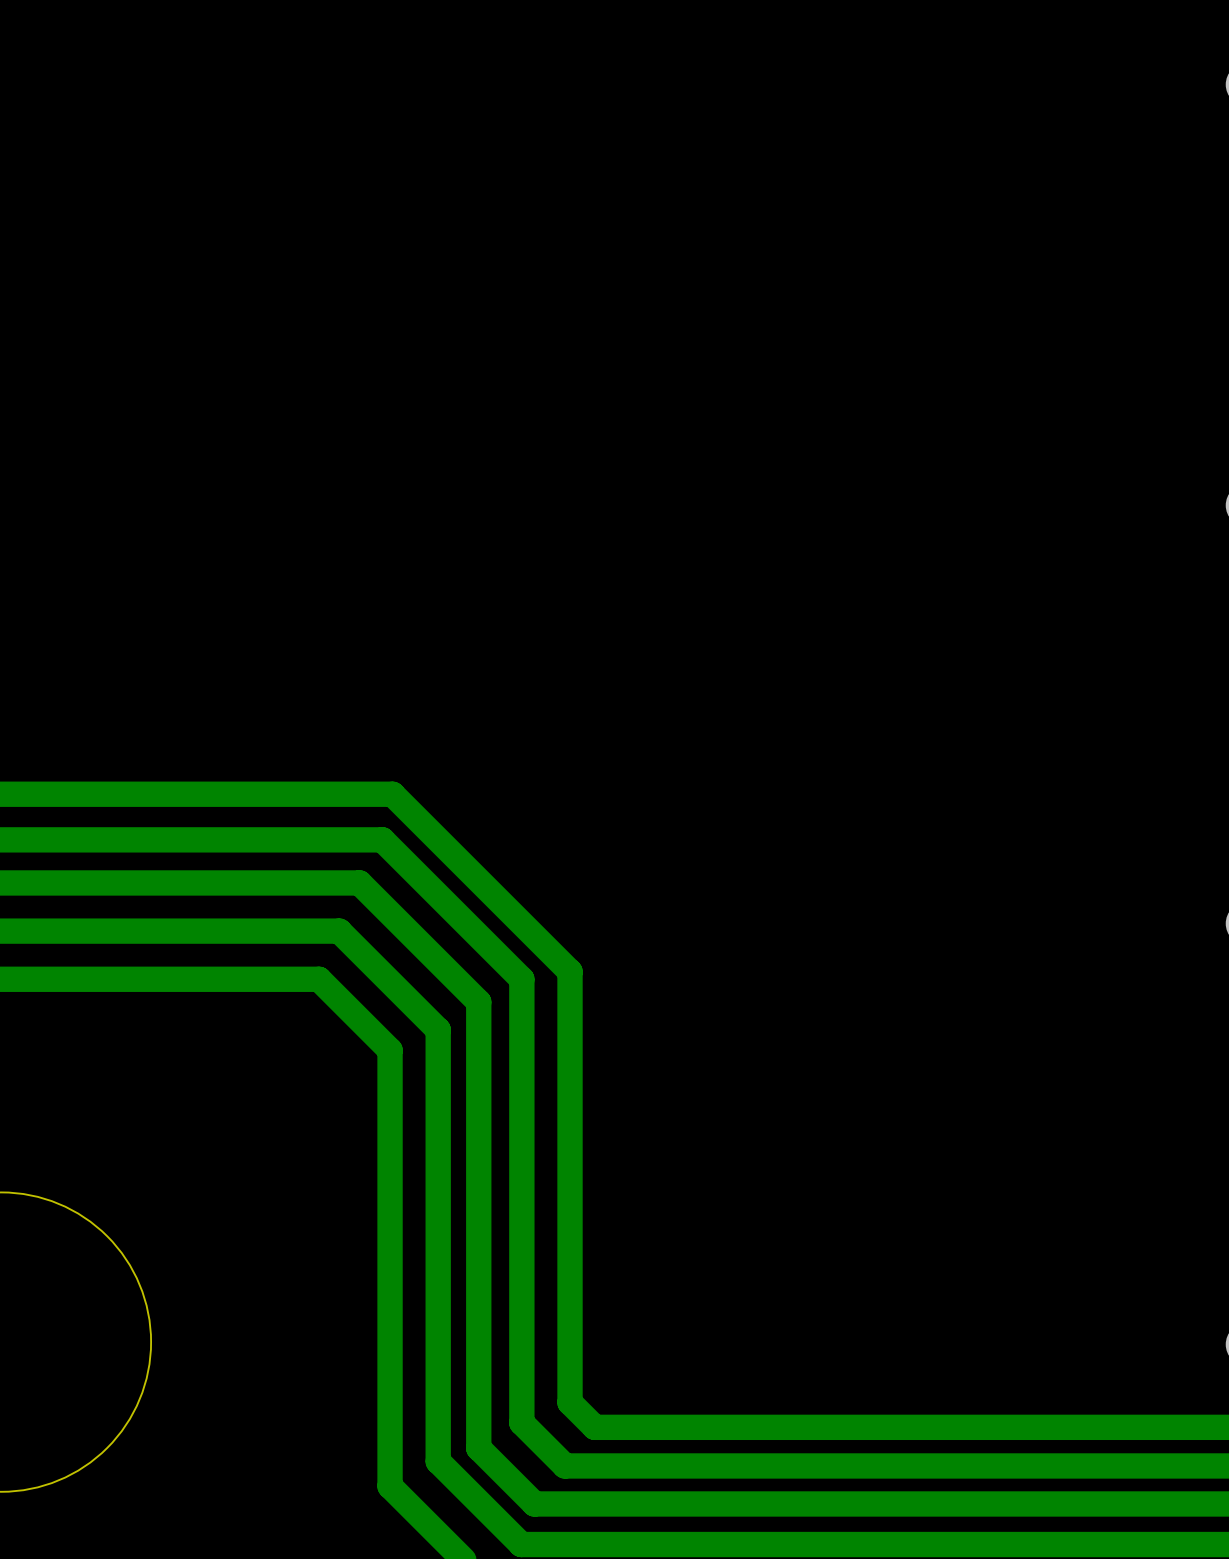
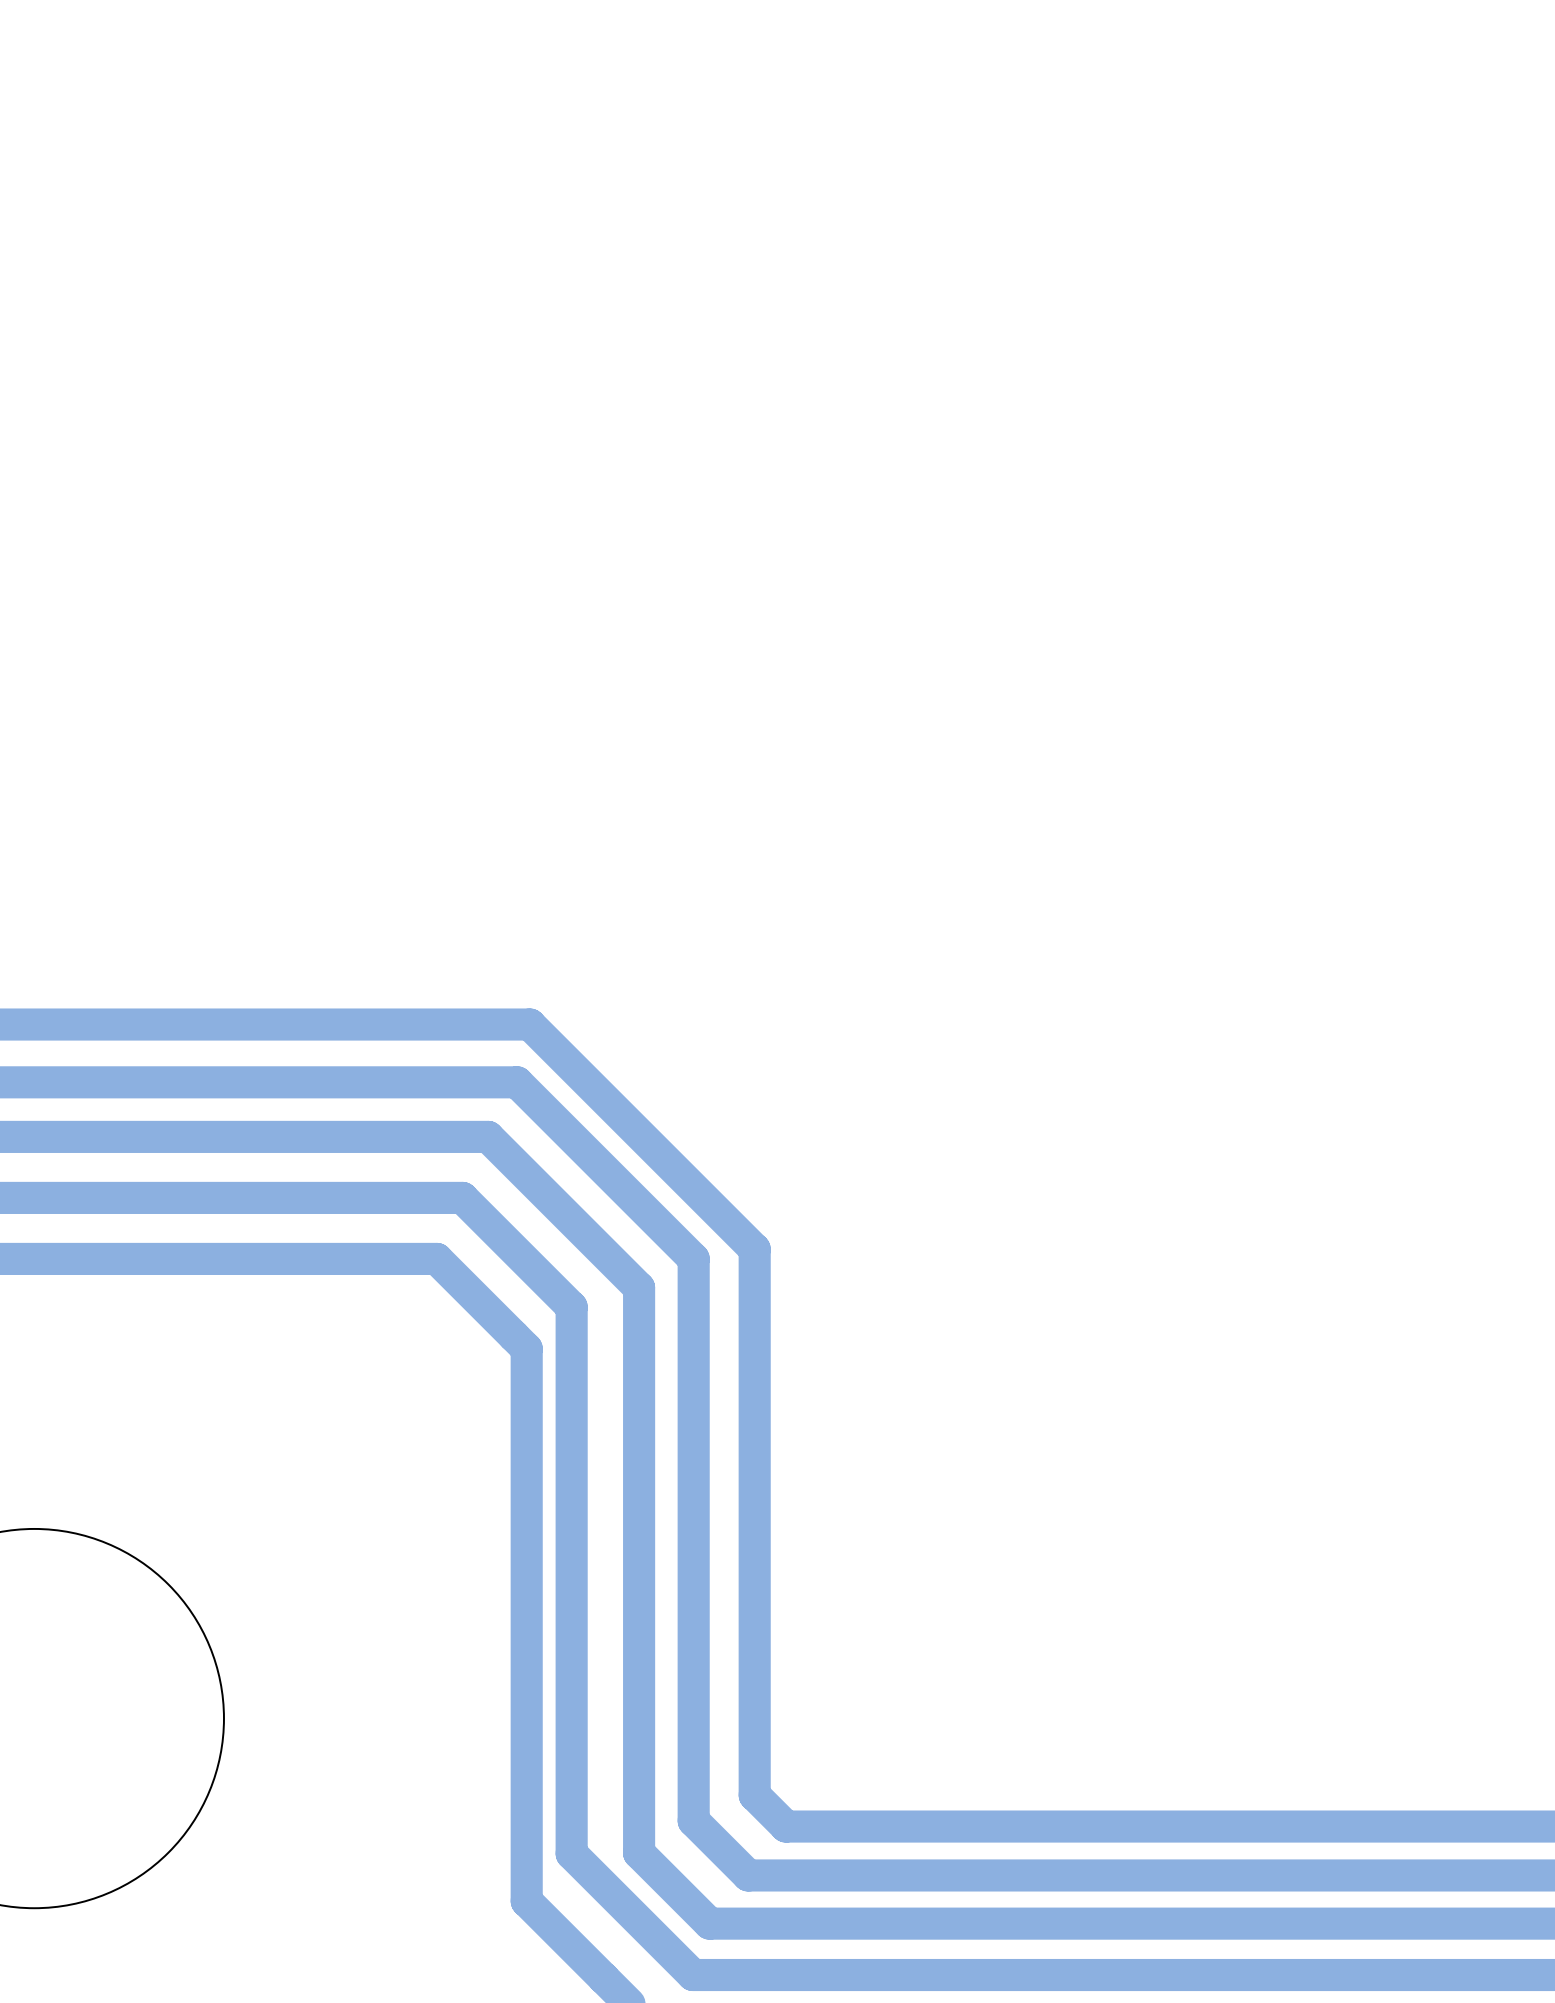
track: (425, 1017) (438, 1029) (438, 1461) -> (571, 1307) (571, 1853) (587, 1869)

